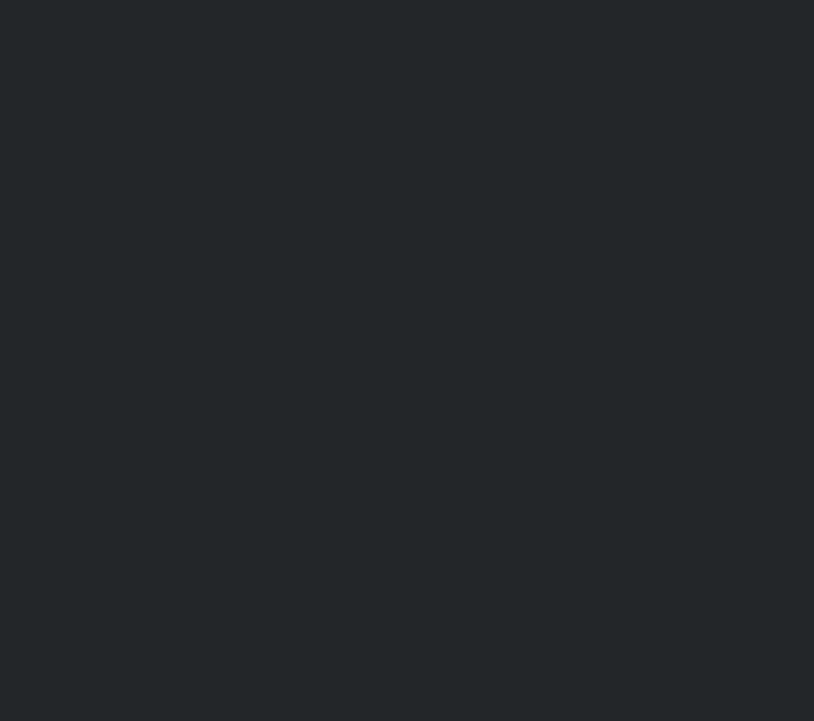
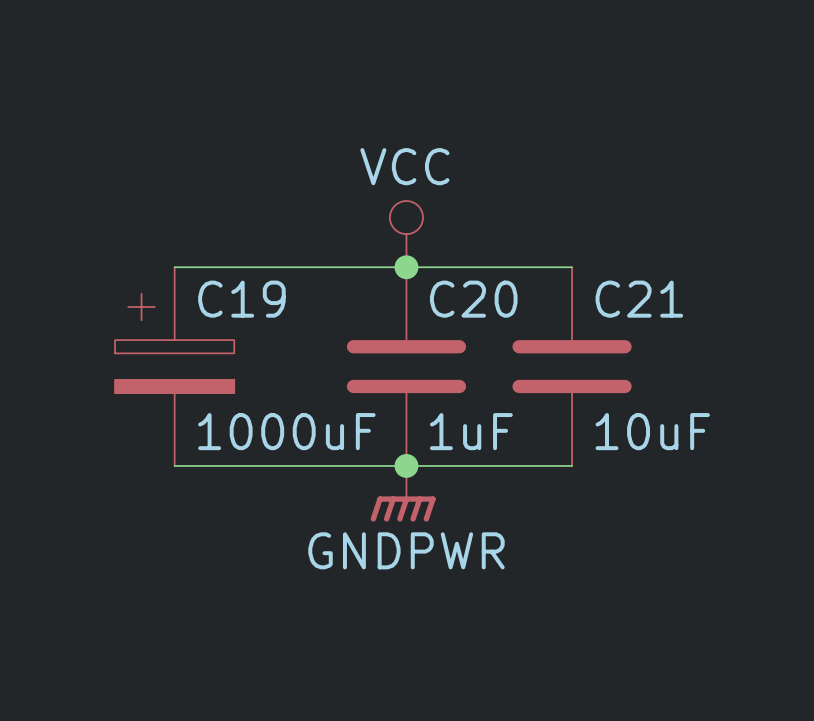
power symbol: none -> VCC (406, 234)
wire: none -> (174, 267) (572, 267)
junction: none -> (406, 267)
C19: none -> 1000uF (174, 366)
C20: none -> 1uF (406, 366)
C21: none -> 10uF (572, 366)
wire: none -> (174, 465) (572, 465)
junction: none -> (406, 465)
power symbol: none -> GNDPWR (403, 493)

